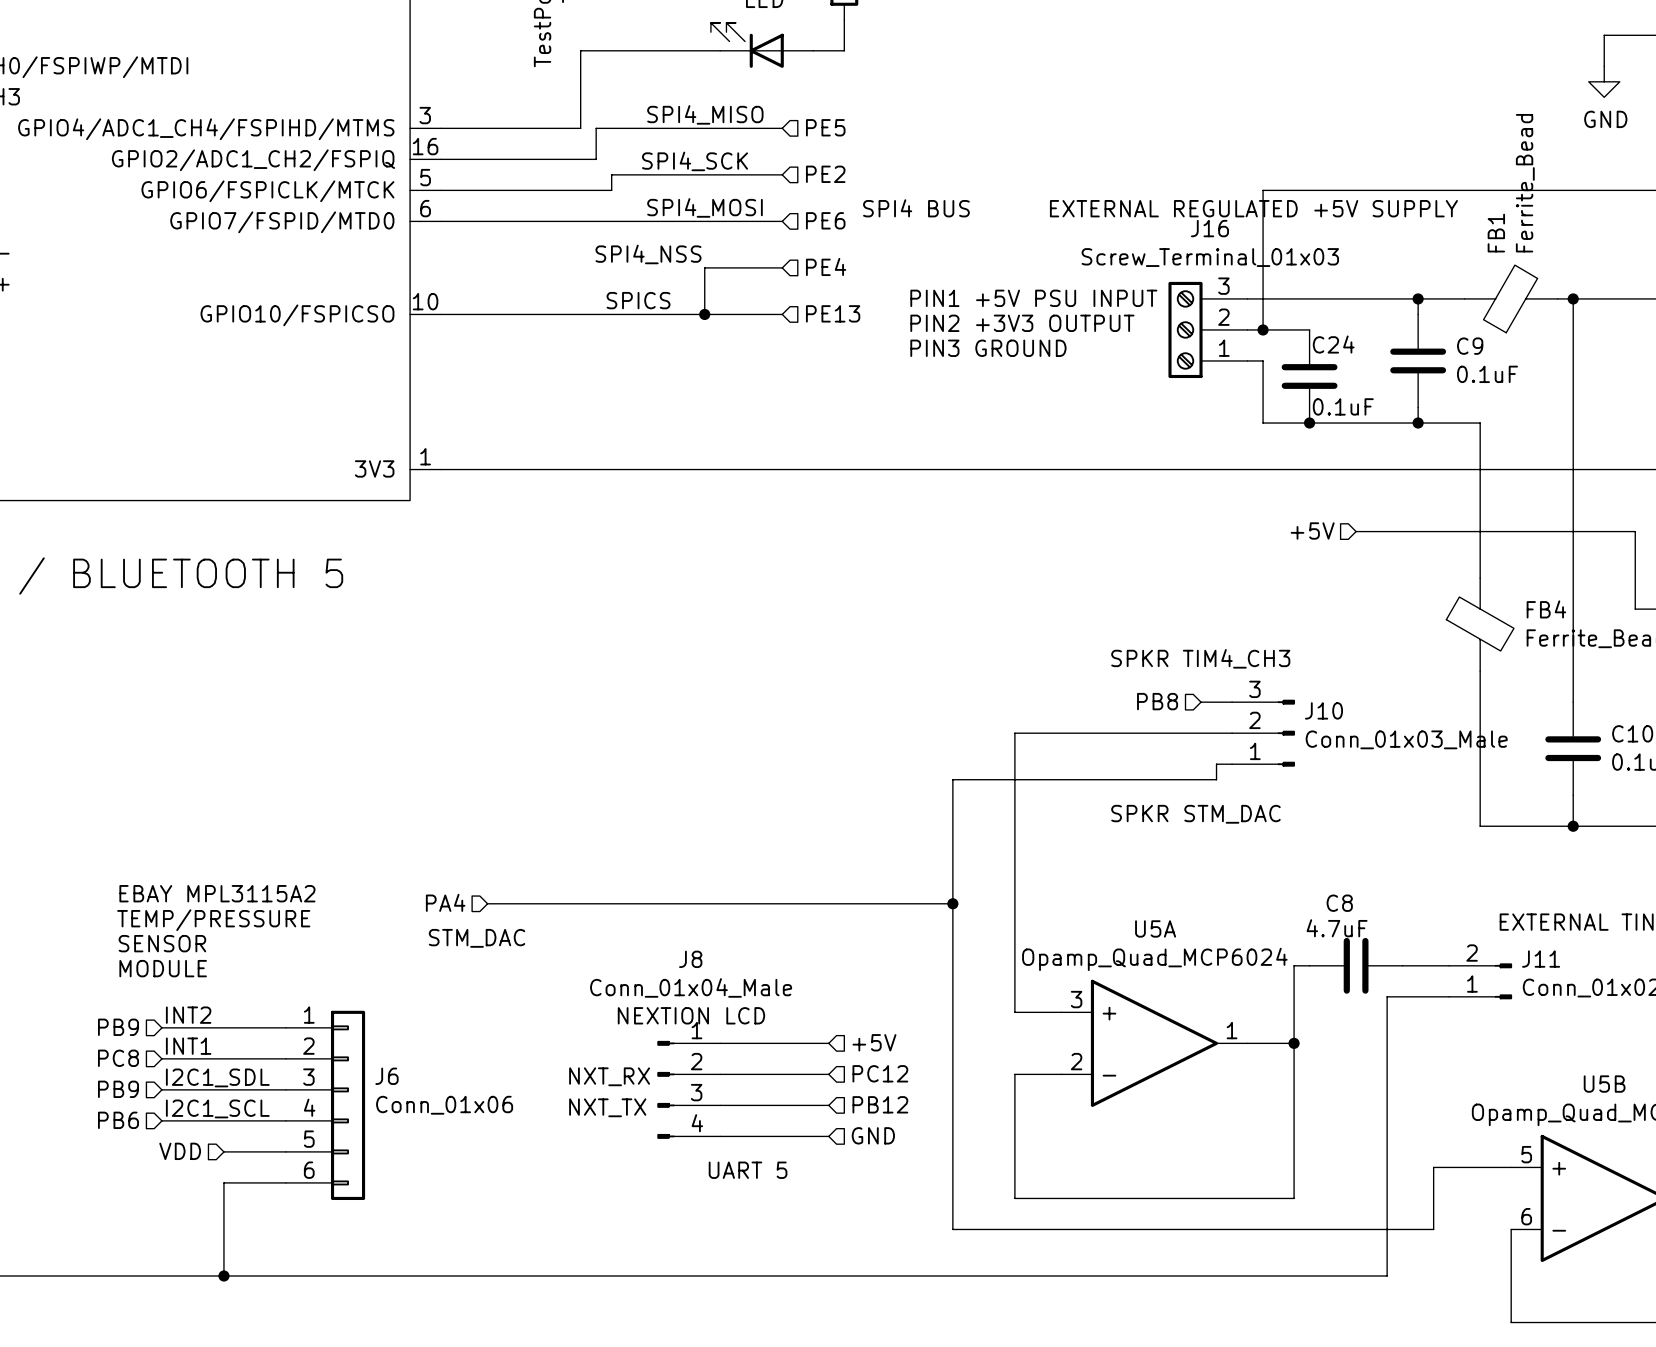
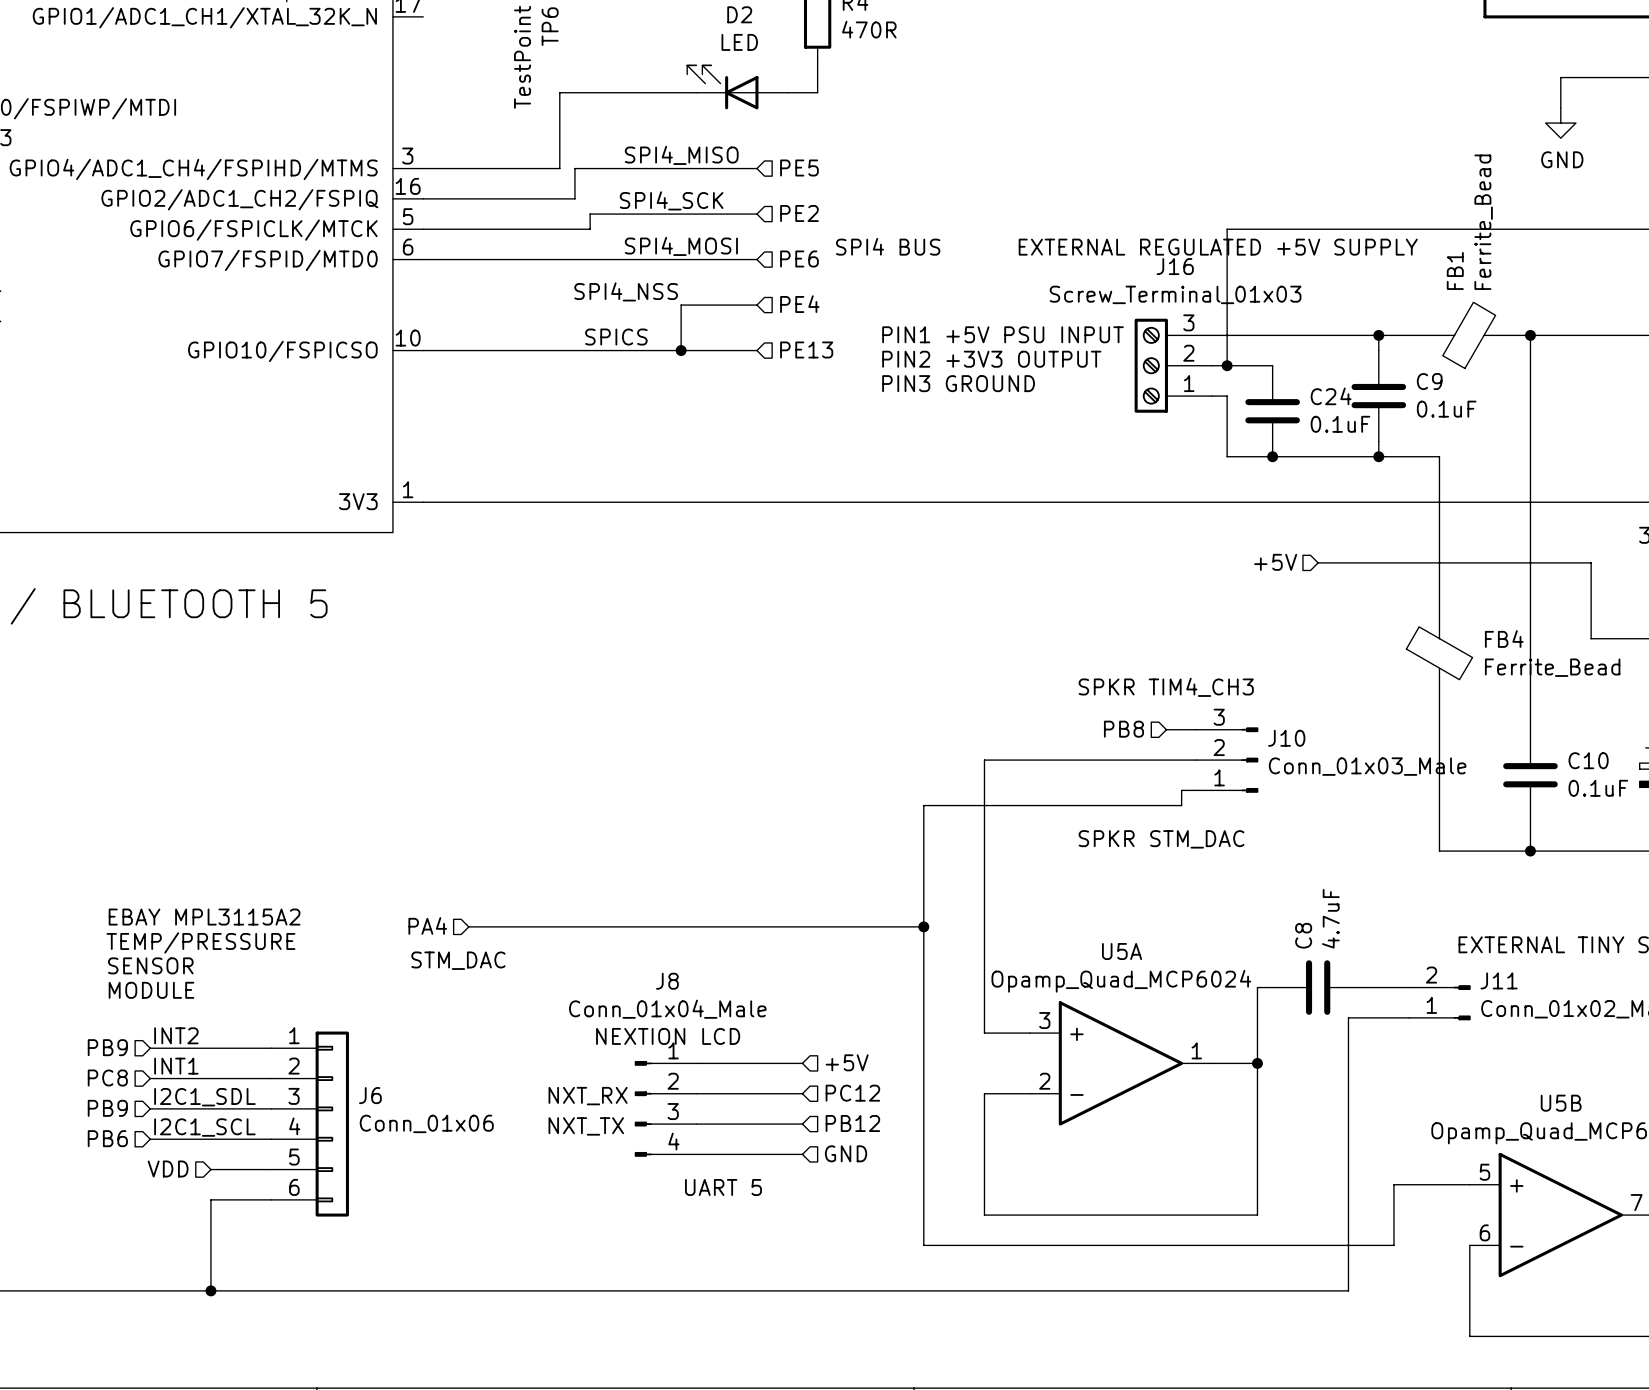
C24 name position: C24 (1333, 344) -> C24 (1331, 396)
C24 value position: 0.1uF (1343, 406) -> 0.1uF (1340, 424)
C8 name rotation: 0° (1339, 903) -> 90° counterclockwise (1303, 935)
C8 value rotation: 0° (1337, 928) -> 90° counterclockwise (1330, 918)

